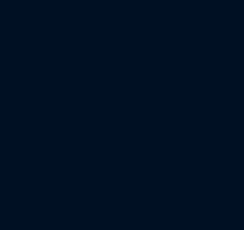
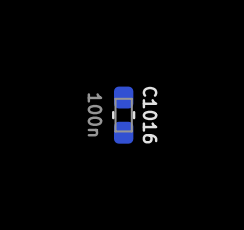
C1016: none -> 100n (123, 115)

